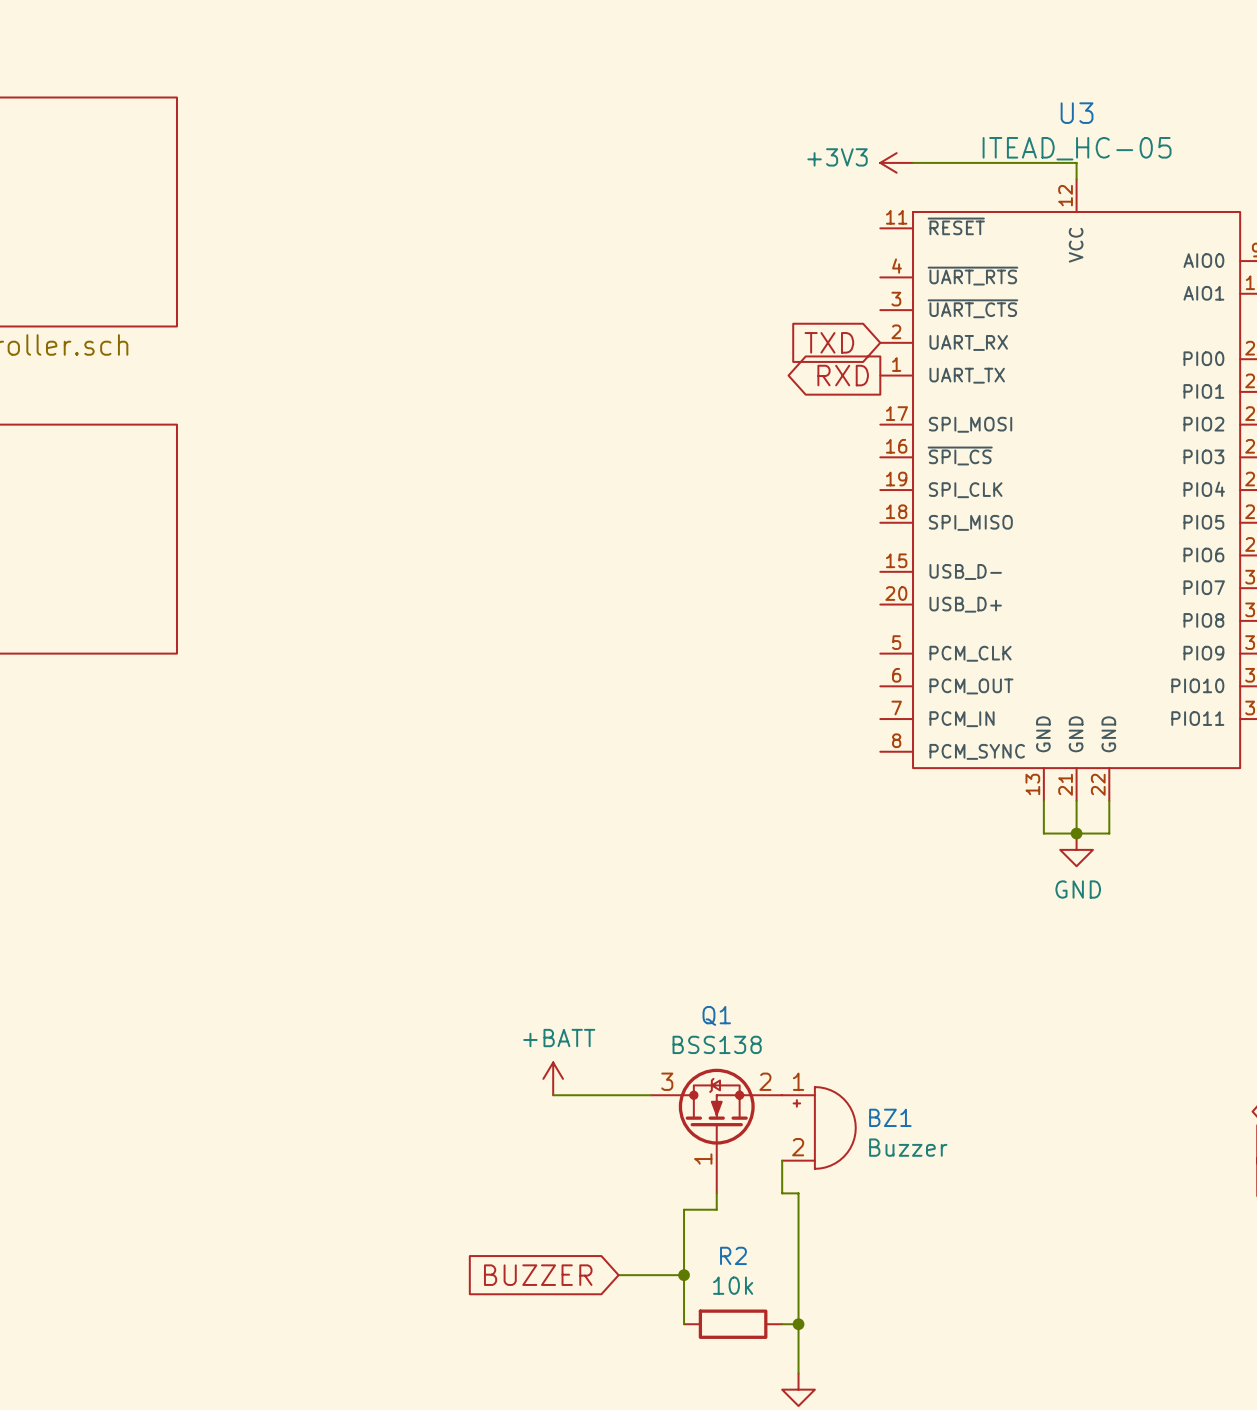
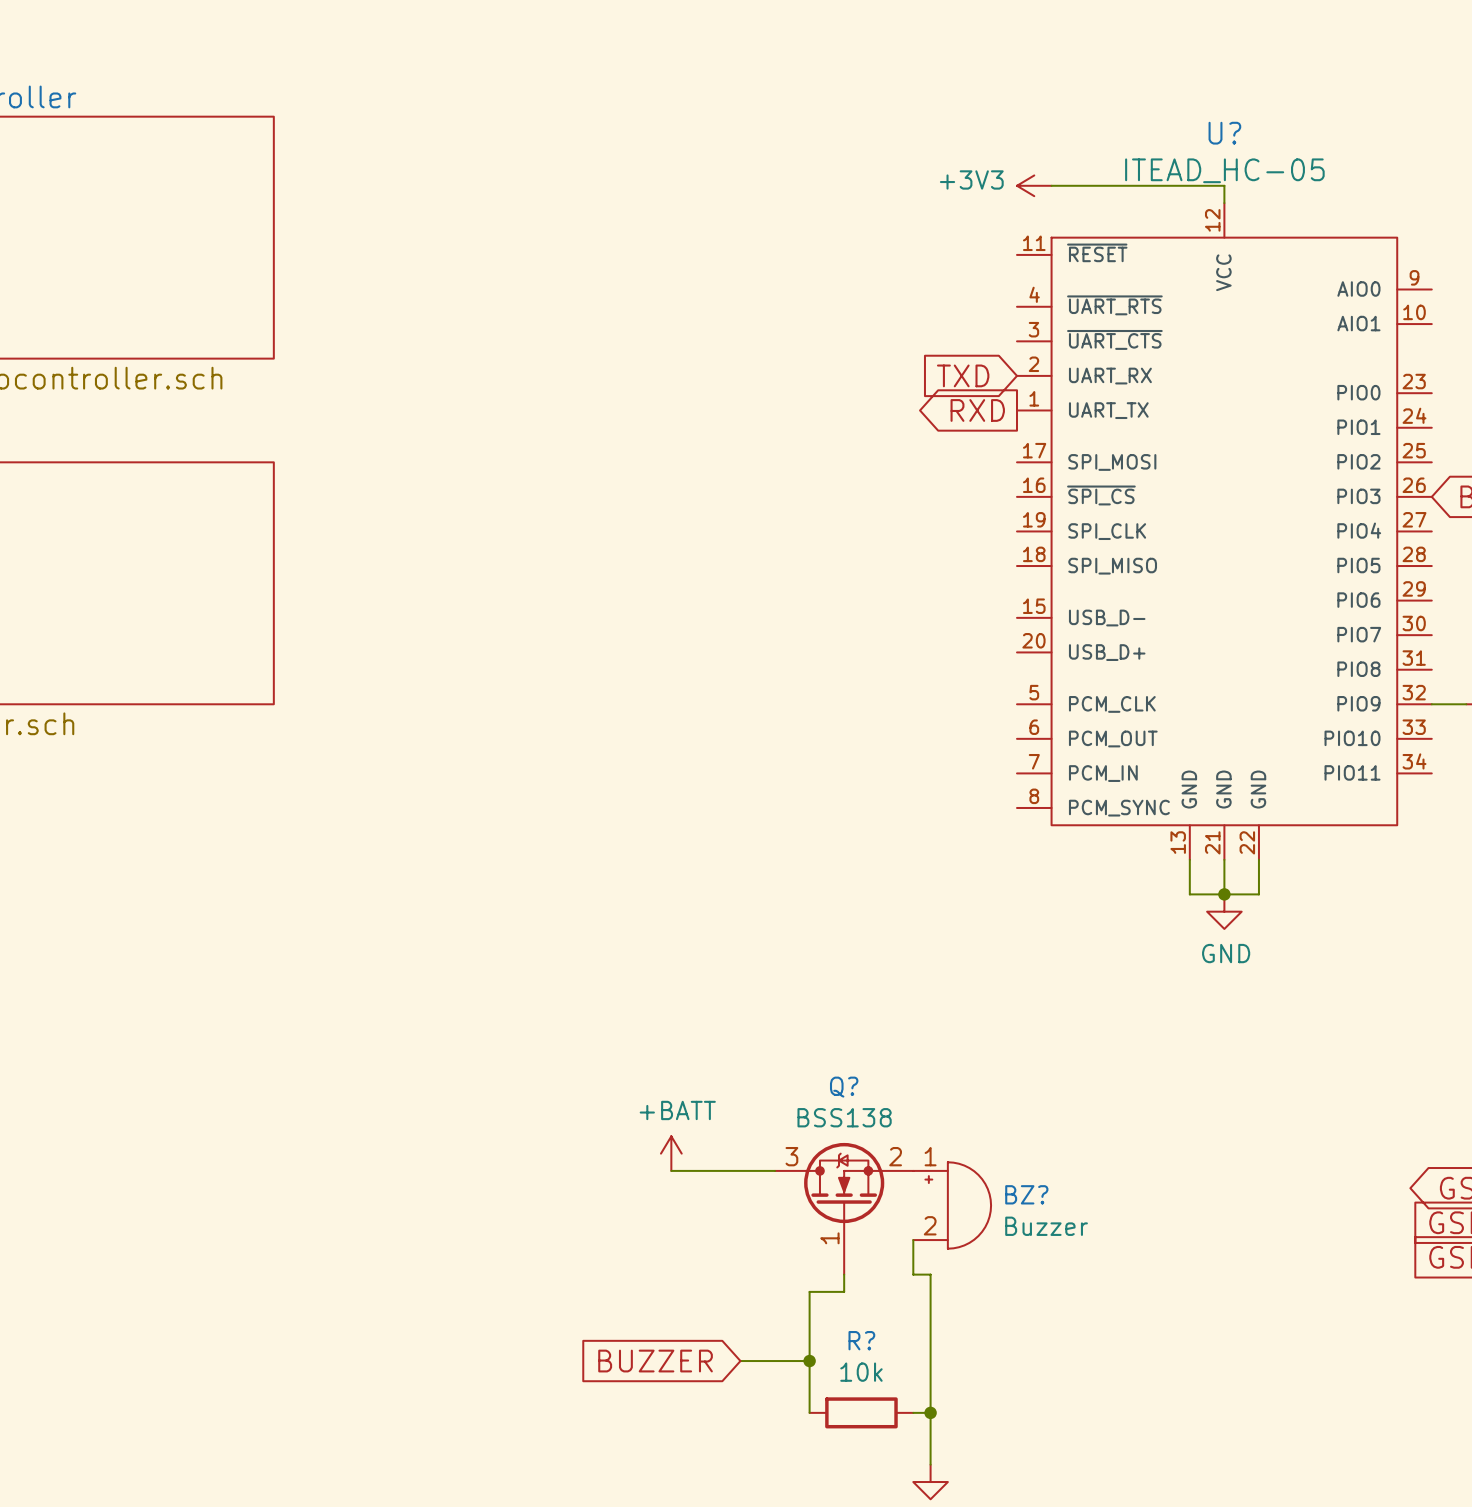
U3 name: U3 (1077, 113) -> U? (1224, 133)
Q1 name: Q1 (716, 1015) -> Q? (844, 1087)
BZ1 name: BZ1 (890, 1117) -> BZ? (1026, 1194)
R2 name: R2 (733, 1255) -> R? (861, 1340)

